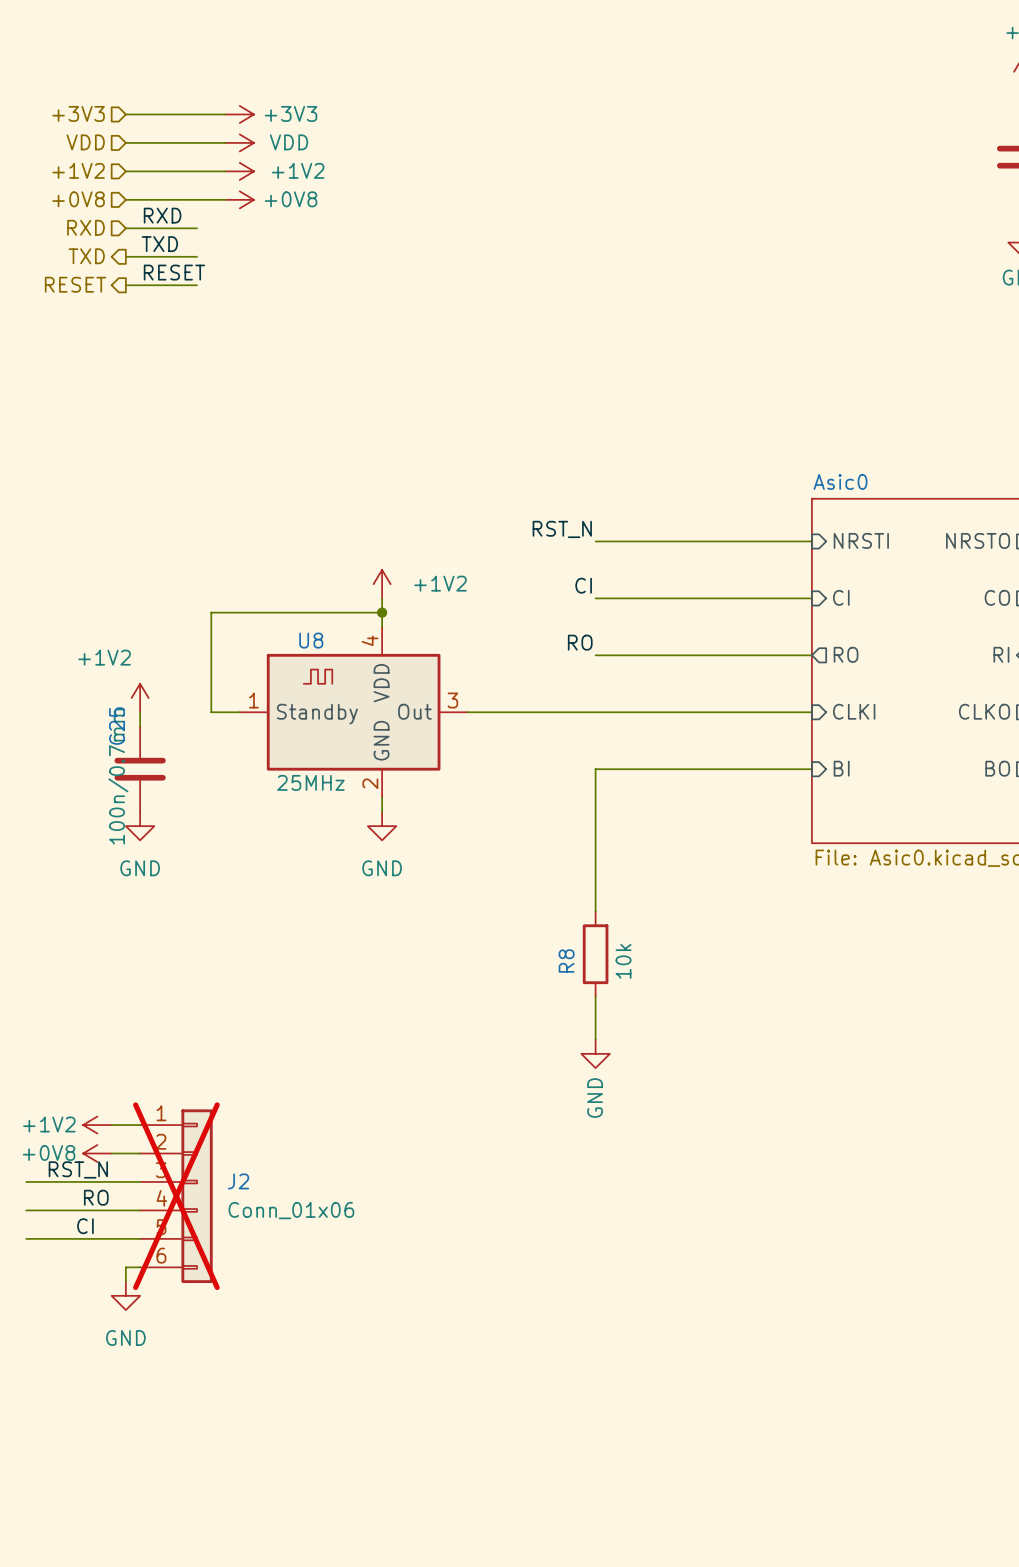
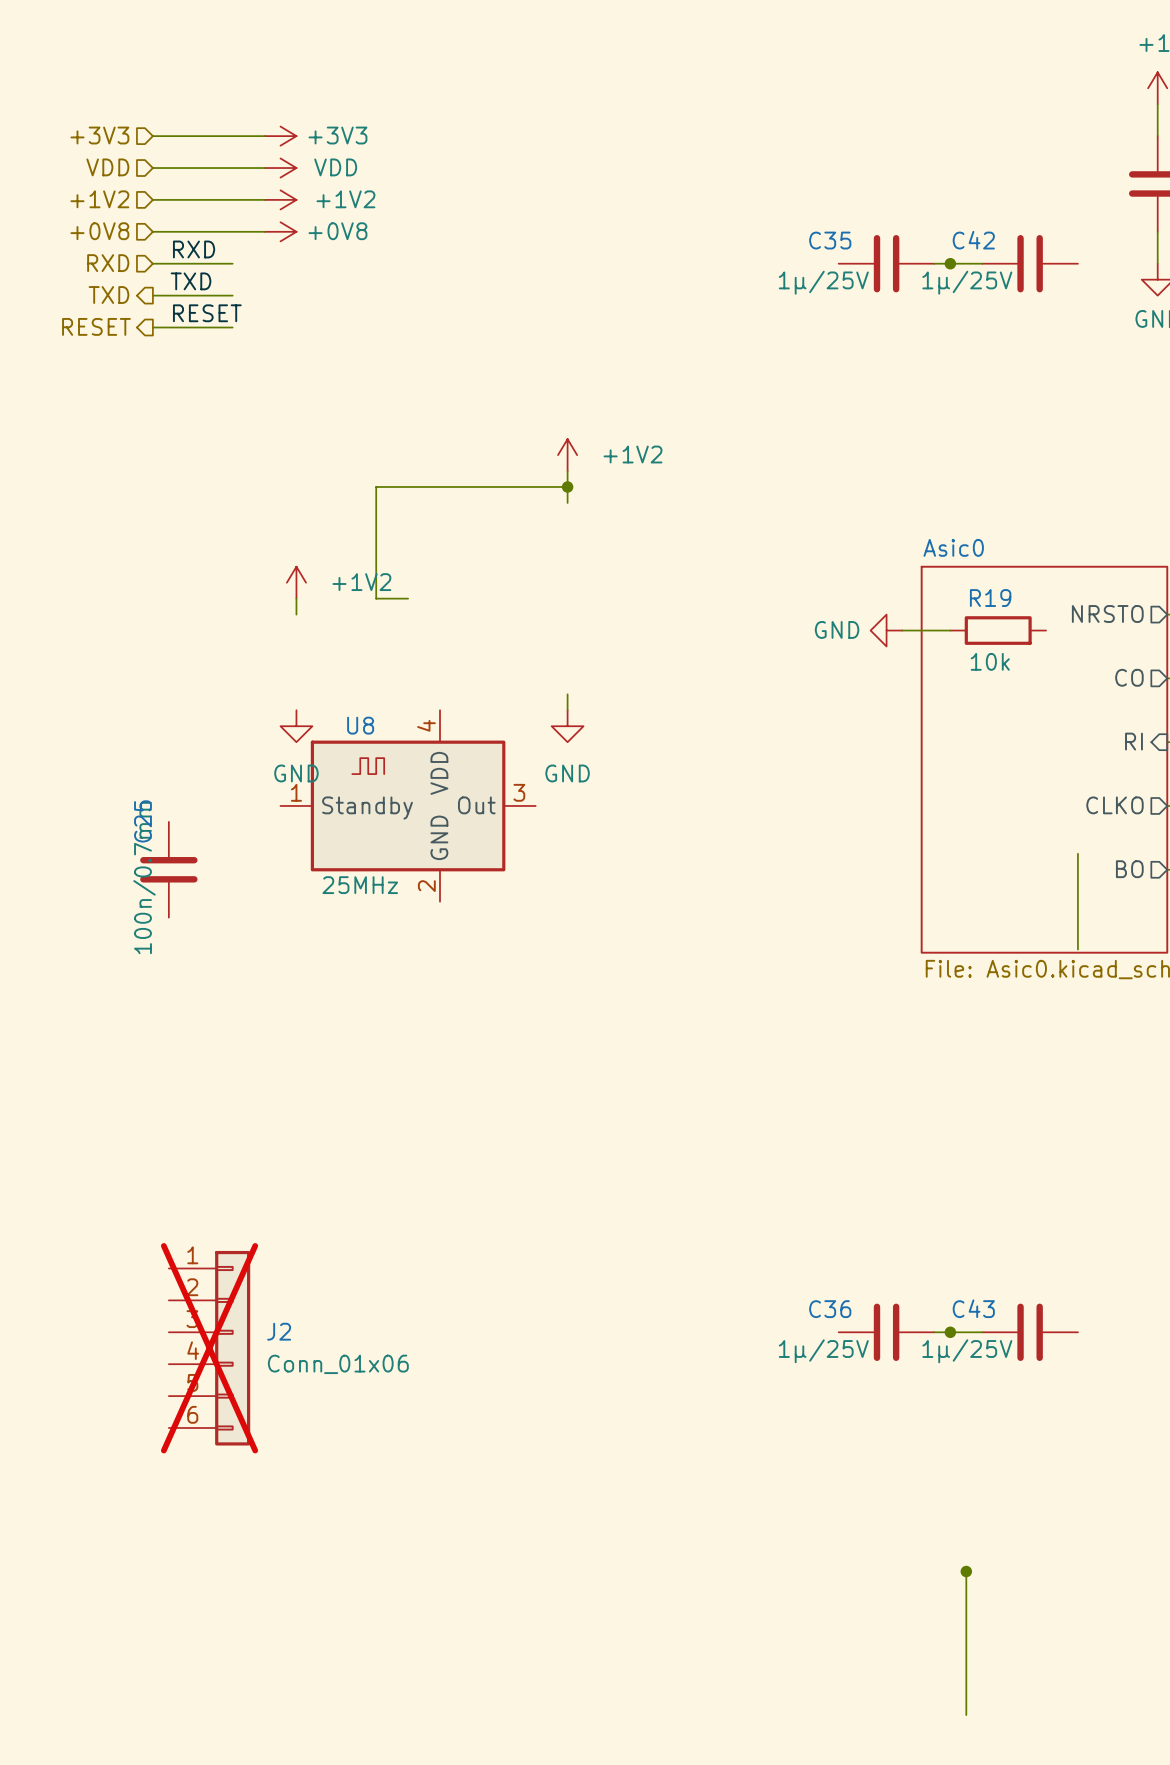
C35: none -> 1µ/25V (886, 263)
wire: none -> (934, 263) (982, 263)
junction: none -> (950, 263)
C42: none -> 1µ/25V (1030, 263)
power symbol: none -> +1V2 (567, 455)
junction: none -> (567, 487)
power symbol: none -> +1V2 (296, 582)
label: RST_N (562, 529) -> none
sheet pin: NRSTI (861, 540) -> none
wire: (595, 541) (811, 541) -> none
power symbol: none -> GND (886, 630)
wire: none -> (902, 630) (950, 630)
R19: none -> 10k (998, 630)
power symbol: +1V2 (382, 584) -> none
label: CI (583, 585) -> none
sheet pin: CI (841, 597) -> none
wire: (382, 598) (382, 626) -> (567, 471) (567, 502)
wire: (595, 598) (811, 598) -> none
wire: (382, 612) (211, 612) (211, 712) (239, 712) -> (567, 487) (376, 487) (376, 598) (408, 598)
junction: (382, 612) -> none
power symbol: none -> GND (296, 726)
power symbol: none -> GND (567, 726)
label: RO (580, 642) -> none
sheet pin: RO (846, 654) -> none
wire: (595, 655) (811, 655) -> none
power symbol: +1V2 (140, 698) -> none
sheet pin: CLKI (854, 711) -> none
wire: (140, 712) (140, 726) -> (296, 598) (296, 614)
wire: (467, 712) (811, 712) -> none
wire: none -> (1077, 853) (1077, 949)
sheet pin: BI (841, 768) -> none
wire: (811, 769) (595, 769) (595, 911) -> none
wire: (382, 797) (382, 811) -> (567, 694) (567, 710)
power symbol: GND (140, 826) -> none
power symbol: GND (382, 826) -> none
R8: 10k (595, 954) -> none
wire: (595, 996) (595, 1039) -> none
power symbol: GND (595, 1053) -> none
power symbol: +1V2 (97, 1125) -> none
wire: (111, 1125) (140, 1125) -> none
power symbol: +0V8 (97, 1153) -> none
wire: (111, 1153) (140, 1153) -> none
label: RST_N (78, 1169) -> none
wire: (26, 1181) (140, 1181) -> none
C36: none -> 1µ/25V (886, 1332)
wire: none -> (934, 1332) (982, 1332)
junction: none -> (950, 1332)
C43: none -> 1µ/25V (1030, 1332)
label: RO (96, 1197) -> none
wire: (26, 1210) (140, 1210) -> none
label: CI (85, 1226) -> none
wire: (26, 1238) (140, 1238) -> none
wire: (140, 1267) (125, 1267) (125, 1281) -> none
power symbol: GND (125, 1295) -> none
wire: none -> (966, 1571) (966, 1715)
junction: none -> (966, 1571)

